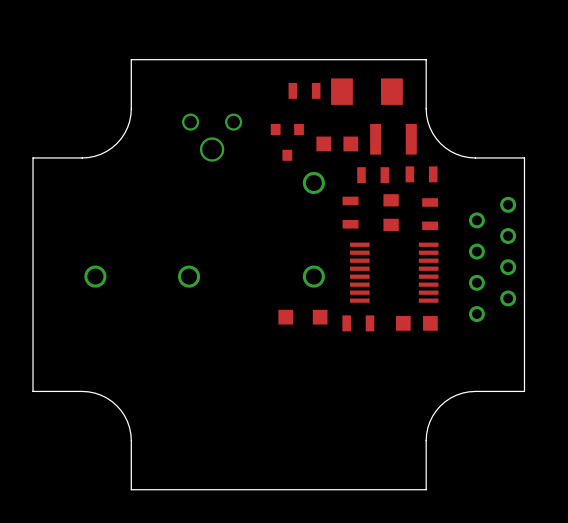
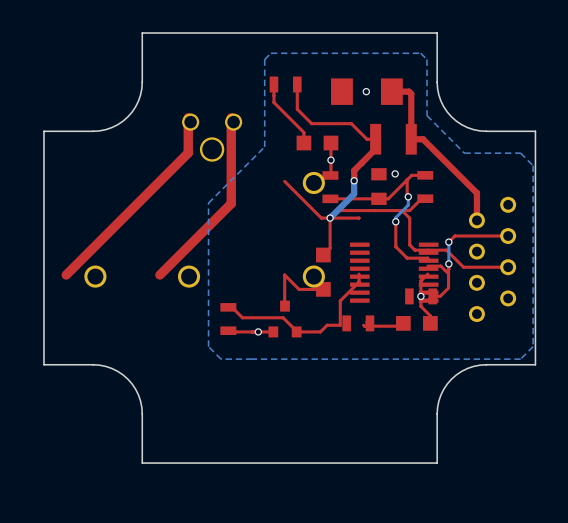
bottom zone outline: none -> (420, 53) (427, 59) (427, 115) (464, 153) (520, 153) (533, 165) (533, 346) (520, 359) (221, 359) (208, 346) (208, 203) (264, 146) (264, 59) (270, 53) (420, 53)
board edge: (426, 59) (426, 115) (432, 133) (440, 143) (456, 154) (468, 157) (524, 157) (524, 391) (468, 391) (456, 395) (440, 405) (432, 416) (426, 434) (426, 489) (131, 489) (130, 434) (124, 416) (116, 405) (100, 395) (88, 391) (33, 391) (33, 157) (88, 157) (100, 154) (116, 143) (124, 133) (130, 115) (131, 59) (426, 59) -> (437, 33) (437, 88) (443, 106) (451, 116) (467, 127) (479, 130) (535, 131) (535, 364) (479, 365) (467, 368) (451, 379) (443, 389) (437, 407) (437, 463) (142, 463) (141, 407) (135, 389) (127, 379) (111, 368) (99, 365) (43, 364) (43, 131) (99, 130) (111, 127) (127, 116) (135, 106) (141, 88) (142, 33) (437, 33)
top track: none -> (273, 84) (273, 102) (303, 132) (303, 143)
top track: none -> (297, 84) (297, 109) (311, 123) (351, 123) (366, 139) (375, 139) (375, 149) (354, 170) (354, 180)
part position: (304, 90) -> (285, 84)
via: none -> (366, 91)
top track: none -> (391, 91) (409, 91) (411, 93) (411, 139) (423, 139) (476, 193) (476, 220)
top track: none -> (188, 117) (188, 152) (66, 275)
top track: none -> (231, 117) (231, 203) (159, 275)
part rotation: 0° (287, 142) -> 180° (285, 319)
part position: (287, 142) -> (285, 319)
top track: none -> (330, 143) (330, 175)
part position: (337, 143) -> (317, 143)
via: none -> (330, 160)
via: none -> (395, 173)
part rotation: 0° (421, 174) -> 90° clockwise (425, 187)
part: (373, 175) -> none
top track: none -> (425, 175) (411, 175) (388, 198) (330, 198)
top track: none -> (407, 179) (408, 196)
bottom track: none -> (354, 180) (354, 194) (330, 218)
via: none -> (354, 180)
top track: none -> (284, 181) (321, 218) (358, 218)
part: none -> (330, 187)
bottom track: none -> (408, 196) (408, 205) (395, 217) (395, 221)
via: none -> (408, 196)
top track: none -> (425, 198) (421, 198) (409, 210) (337, 210) (330, 218) (330, 248) (323, 255)
top track: none -> (402, 210) (409, 218) (409, 244) (414, 250) (446, 250) (463, 267) (508, 267)
part: (350, 212) -> none
part position: (391, 212) -> (378, 186)
part: (430, 214) -> none
via: none -> (330, 218)
top track: none -> (395, 221) (395, 246) (407, 258) (427, 258)
via: none -> (395, 221)
top track: none -> (508, 236) (454, 236) (448, 242)
bottom track: none -> (448, 242) (448, 263)
via: none -> (448, 242)
top track: none -> (448, 263) (448, 288) (440, 296) (432, 296)
via: none -> (448, 263)
top track: none -> (427, 266) (440, 266) (448, 273)
top track: none -> (359, 274) (359, 282) (340, 300) (340, 325) (327, 325) (320, 331) (296, 331) (283, 317) (242, 317) (232, 307) (228, 307)
top track: none -> (427, 274) (420, 281) (420, 306) (430, 315) (430, 326)
top track: none -> (323, 289) (299, 289) (284, 275) (285, 306)
via: none -> (420, 296)
part: none -> (421, 296)
part rotation: 0° (302, 317) -> 90° clockwise (323, 272)
part position: (302, 317) -> (323, 272)
part: none -> (228, 319)
top track: none -> (363, 325) (403, 326)
top track: none -> (228, 330) (273, 331)
via: none -> (258, 331)

